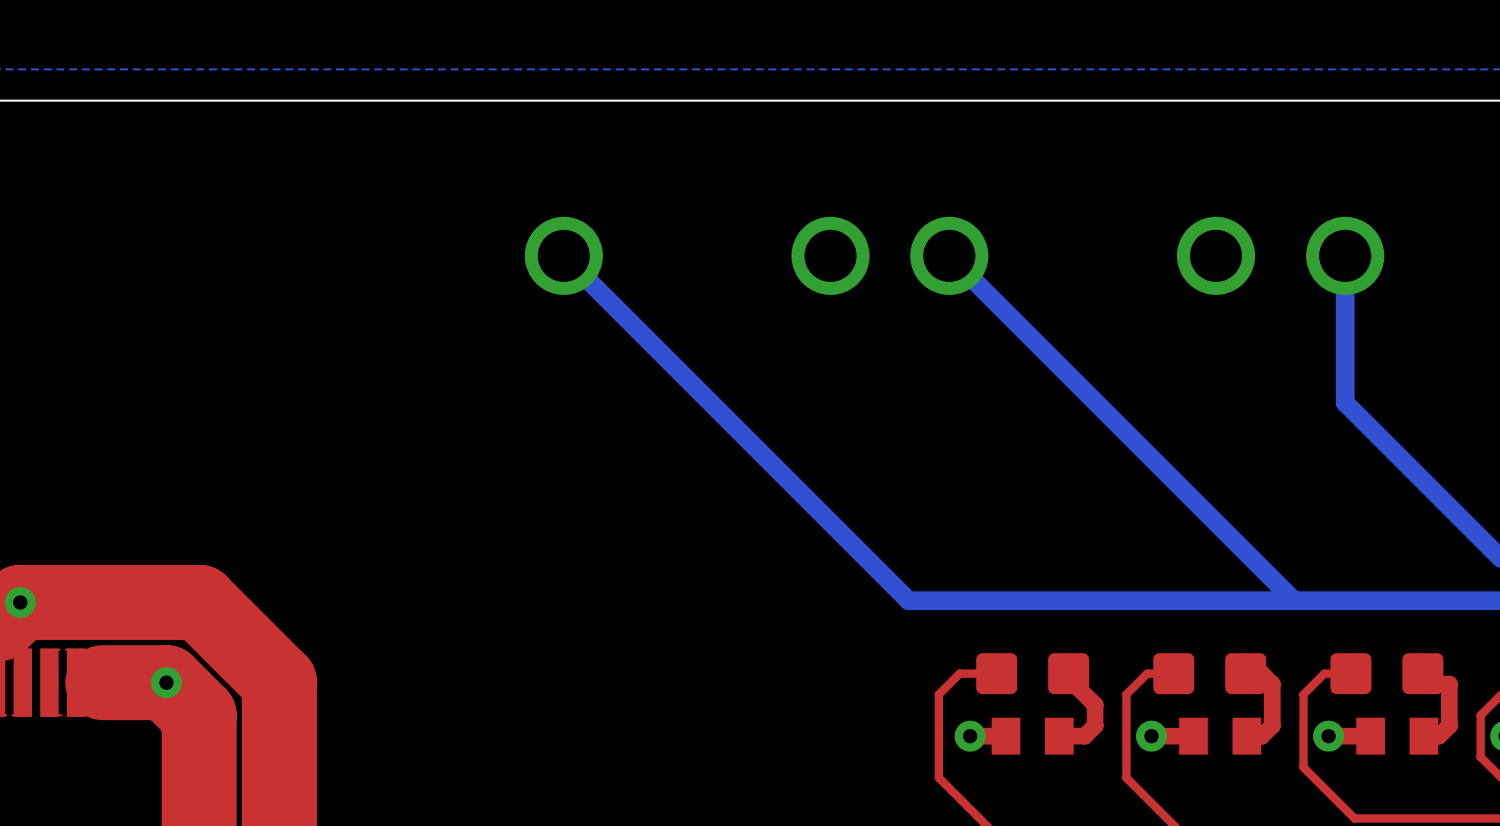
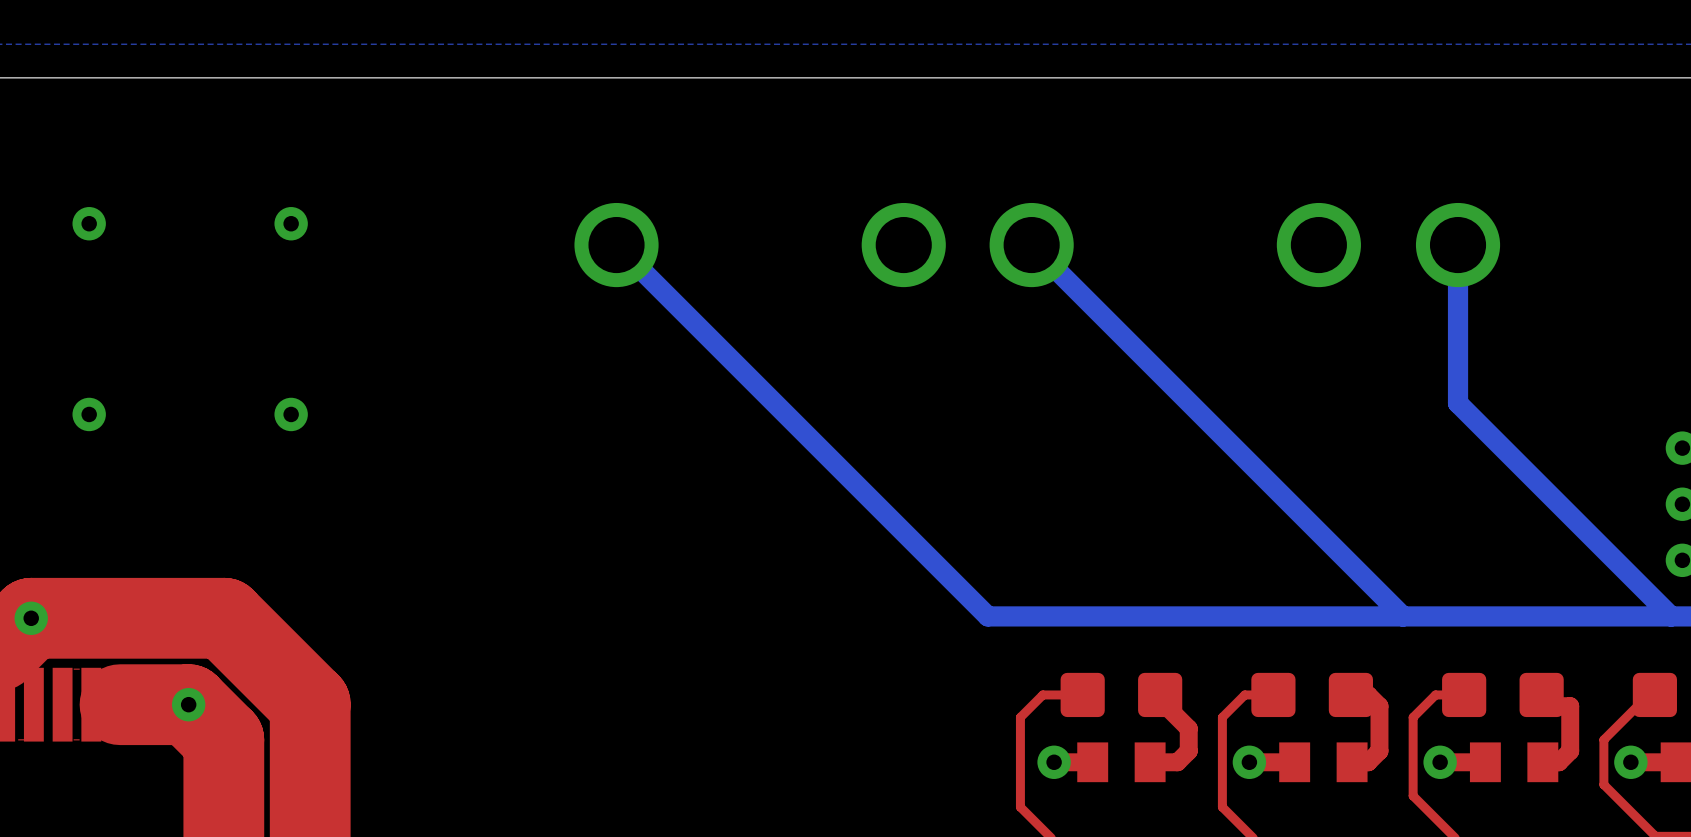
via: none -> (89, 223)
via: none -> (291, 223)
via: none -> (89, 414)
via: none -> (291, 414)

